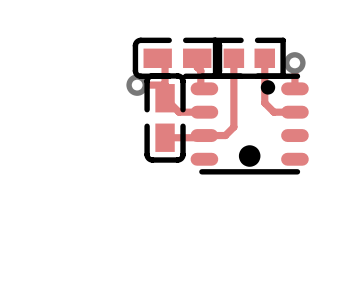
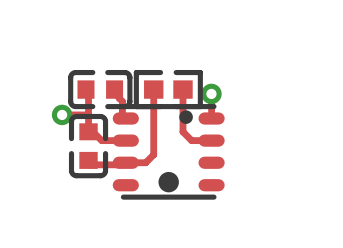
part footprint: [132, 37, 223, 79] -> [68, 69, 133, 110]
part footprint: [144, 73, 186, 163] -> [68, 113, 109, 179]

